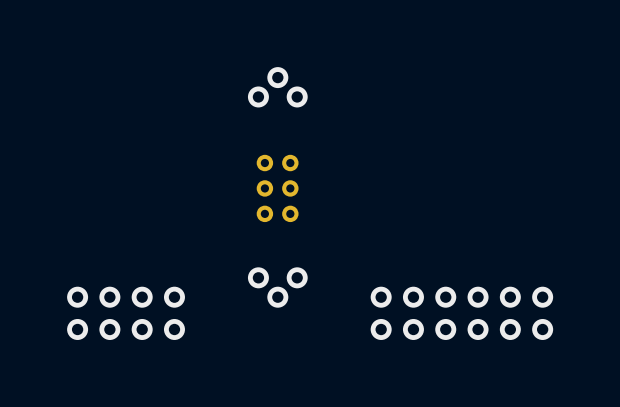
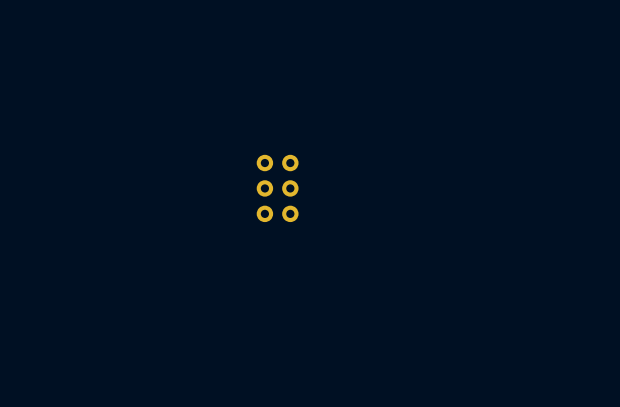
via: (277, 77) -> none
via: (258, 96) -> none
via: (297, 96) -> none
via: (258, 277) -> none
via: (297, 277) -> none
via: (77, 297) -> none
via: (109, 297) -> none
via: (142, 297) -> none
via: (174, 297) -> none
via: (277, 297) -> none
via: (381, 297) -> none
via: (413, 297) -> none
via: (445, 297) -> none
via: (478, 297) -> none
via: (510, 297) -> none
via: (542, 297) -> none
via: (77, 329) -> none
via: (109, 329) -> none
via: (142, 329) -> none
via: (174, 329) -> none
via: (381, 329) -> none
via: (413, 329) -> none
via: (445, 329) -> none
via: (478, 329) -> none
via: (510, 329) -> none
via: (542, 329) -> none

